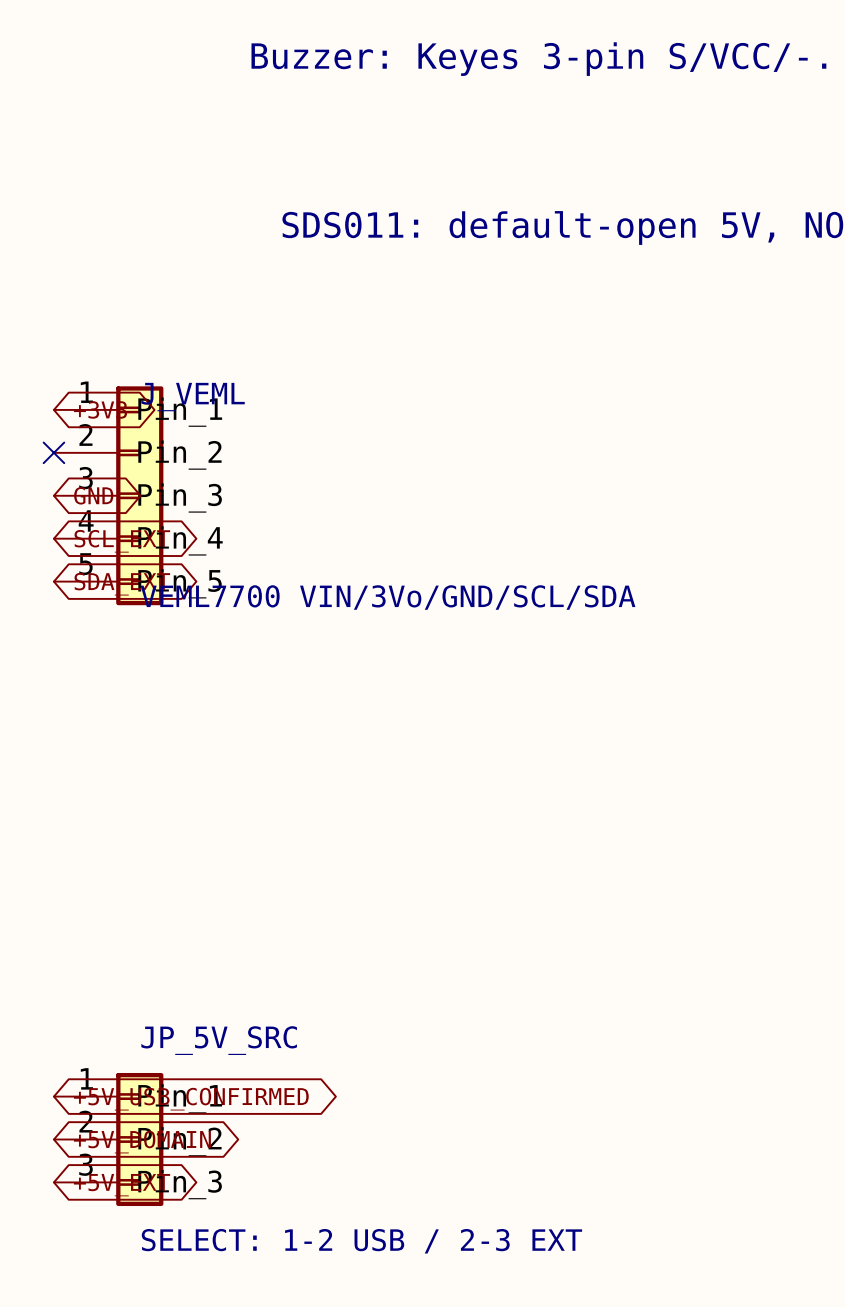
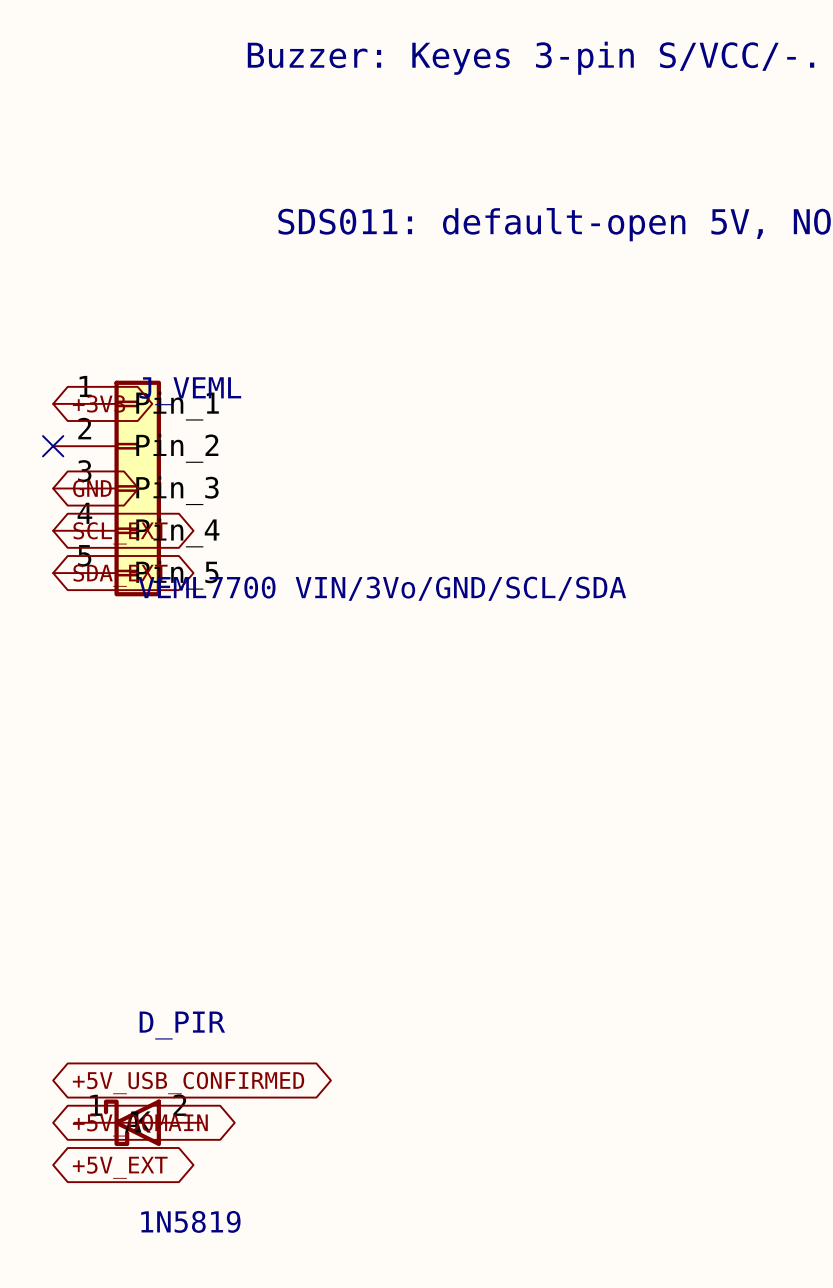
JP_5V_SRC: SELECT: 1-2 USB / 2-3 EXT (108, 1139) -> none
D_PIR: none -> 1N5819 (137, 1122)

